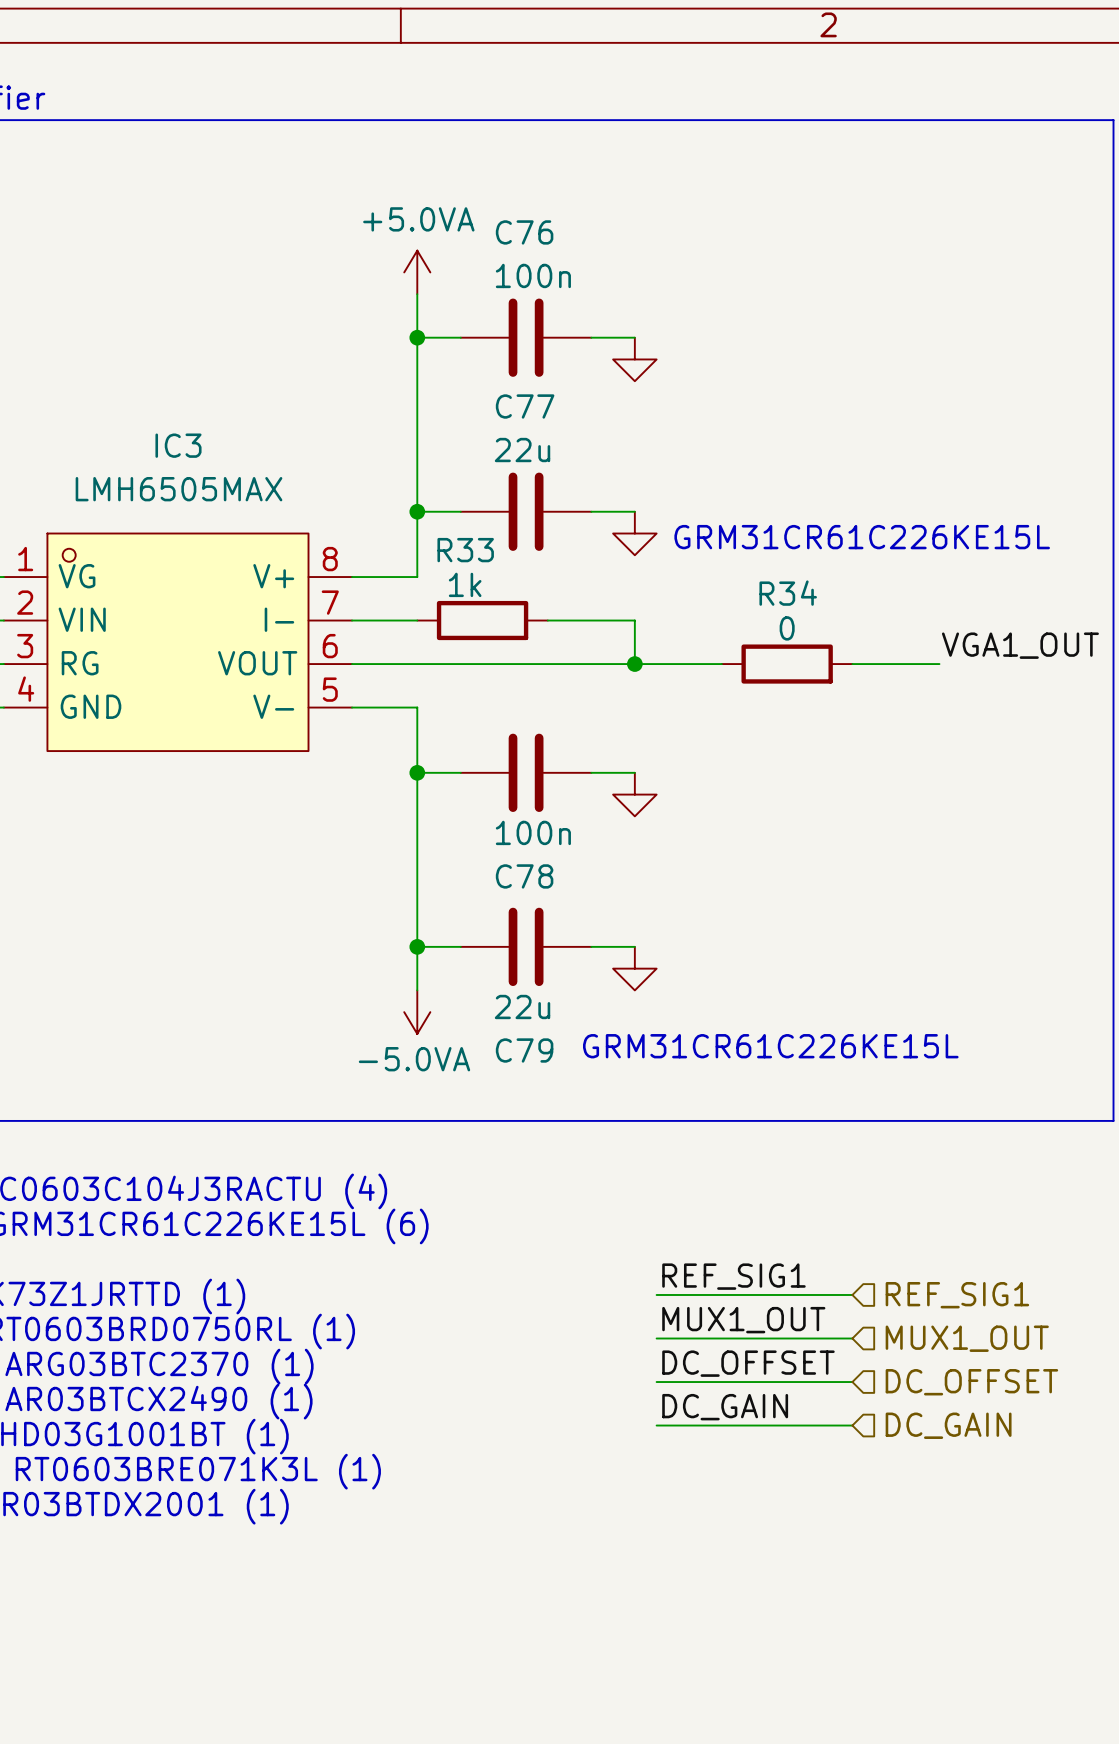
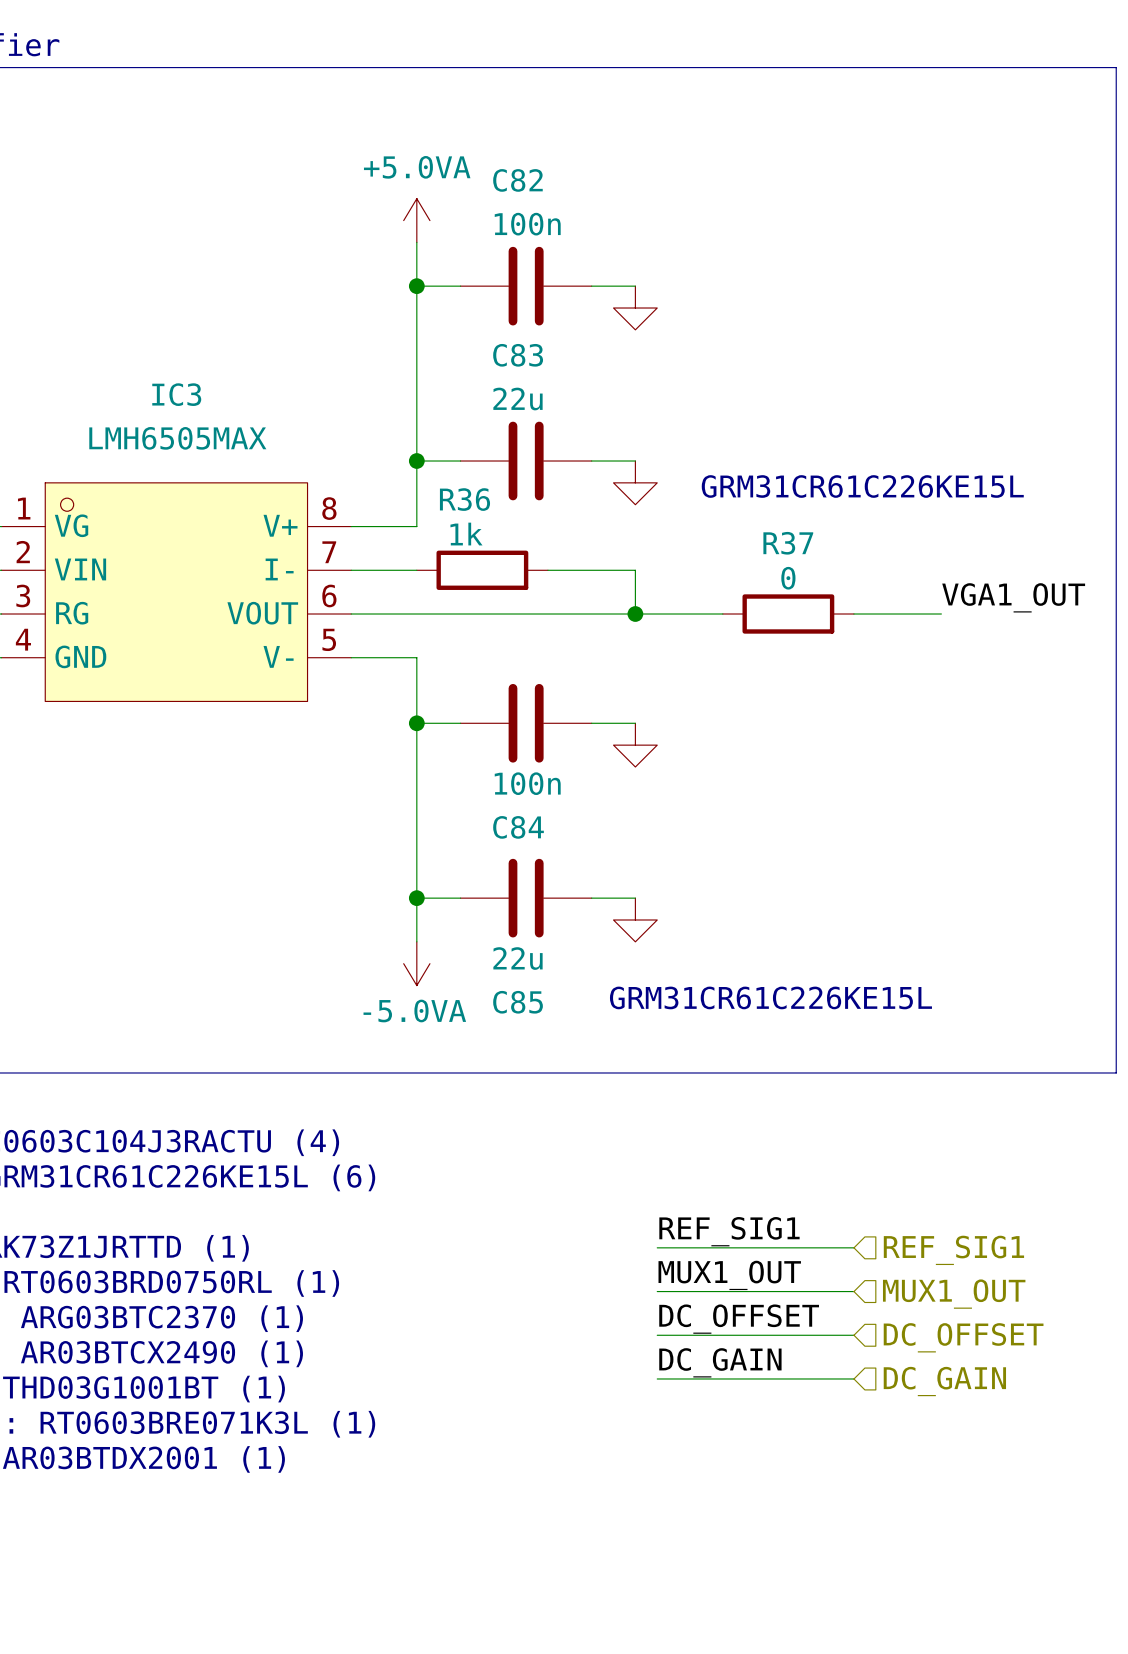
C76 name: C76 (524, 232) -> C82 (517, 180)
C77 name: C77 (525, 406) -> C83 (518, 355)
R33 name: R33 (465, 550) -> R36 (464, 499)
R34 name: R34 (788, 593) -> R37 (788, 543)
C78 name: C78 (524, 876) -> C84 (518, 827)
C79 name: C79 (524, 1050) -> C85 (518, 1002)

